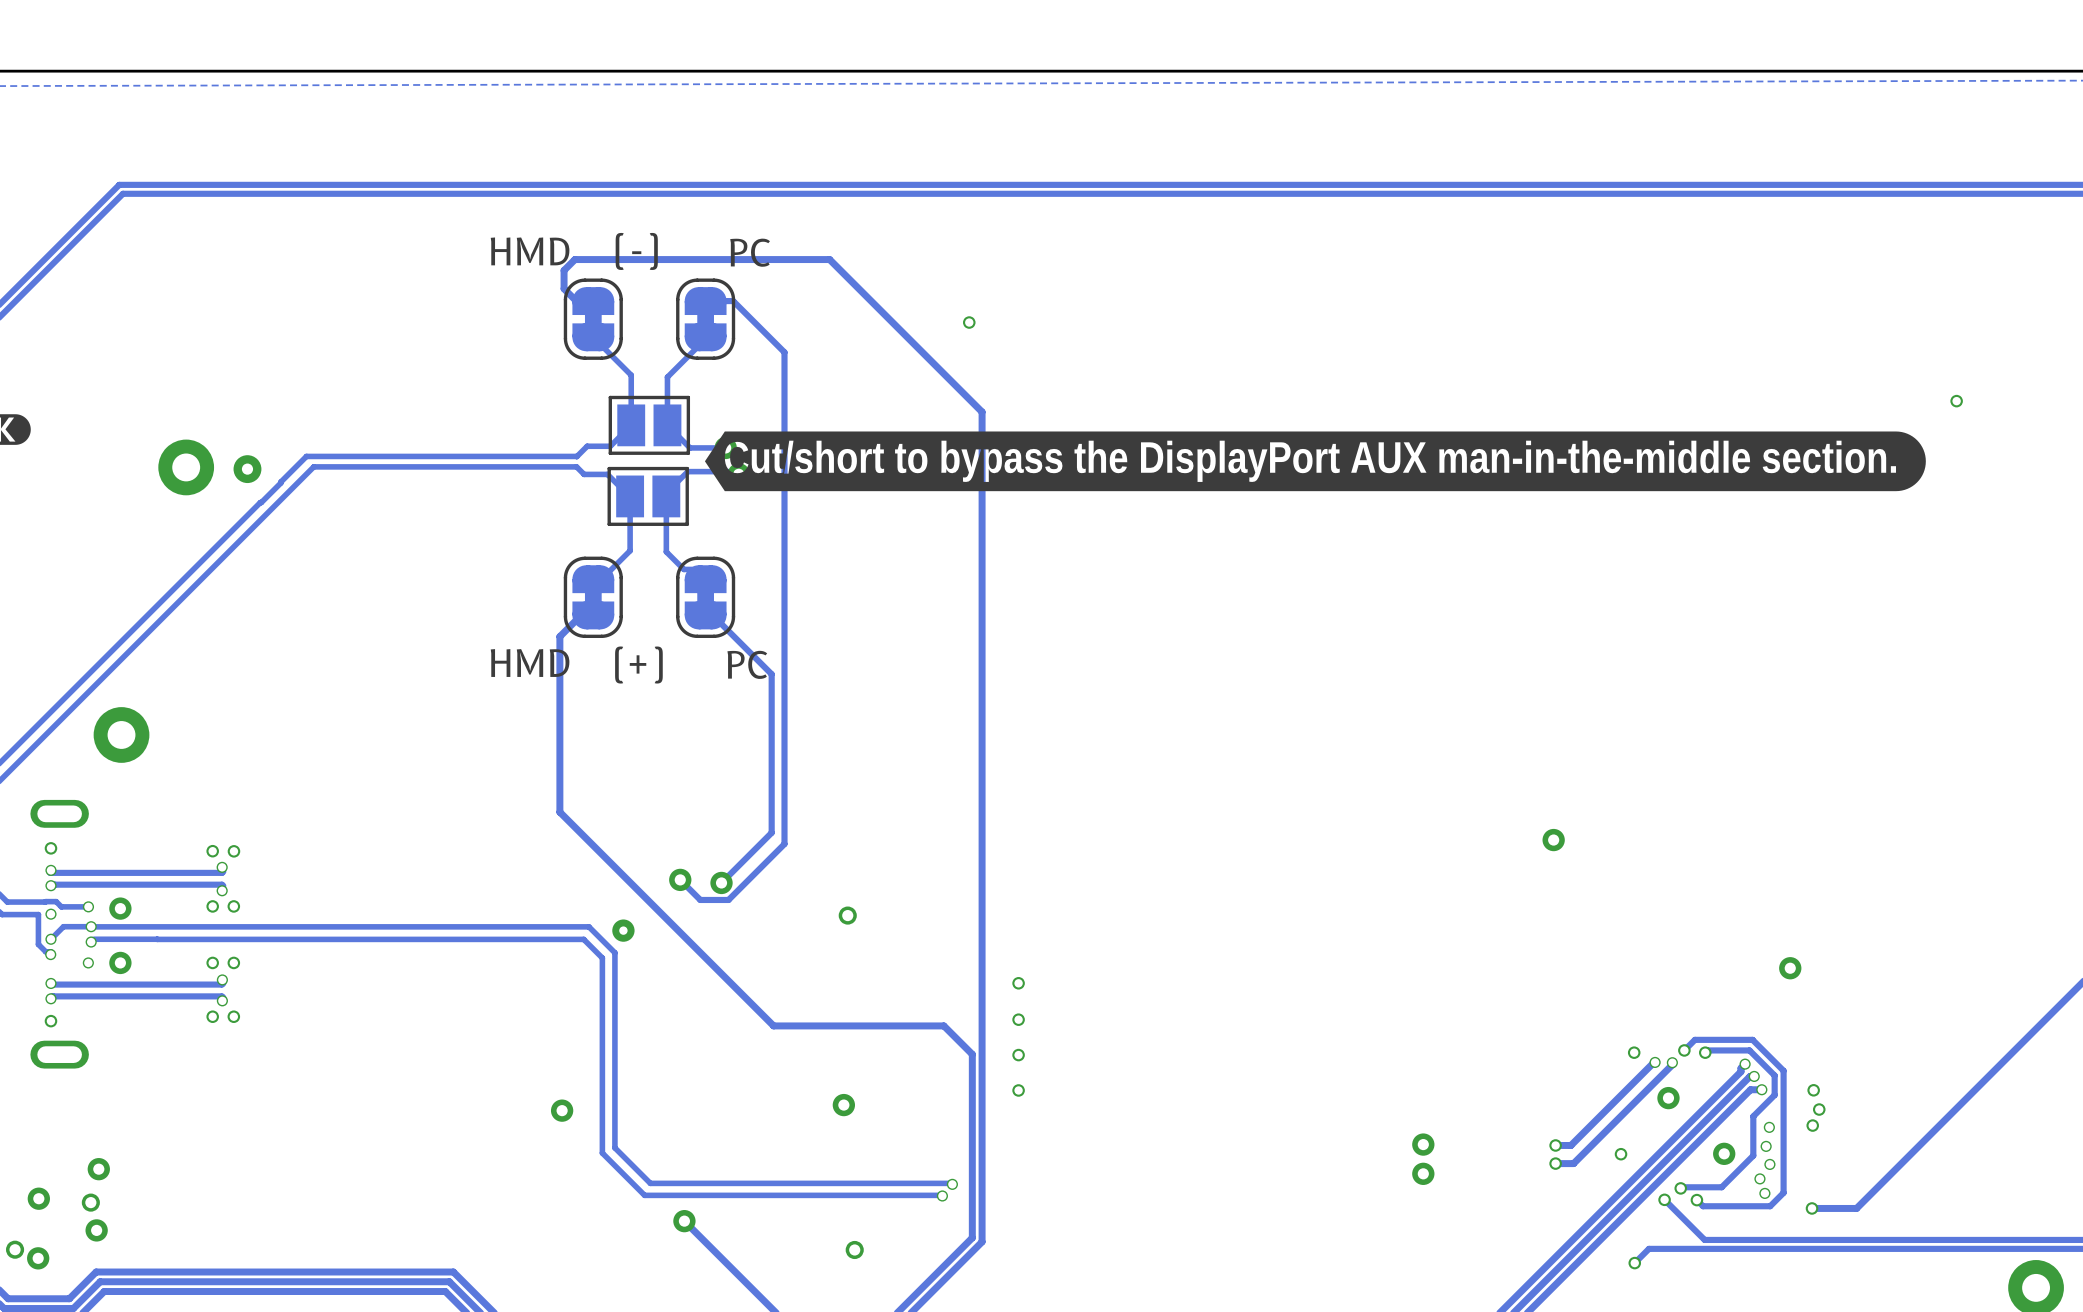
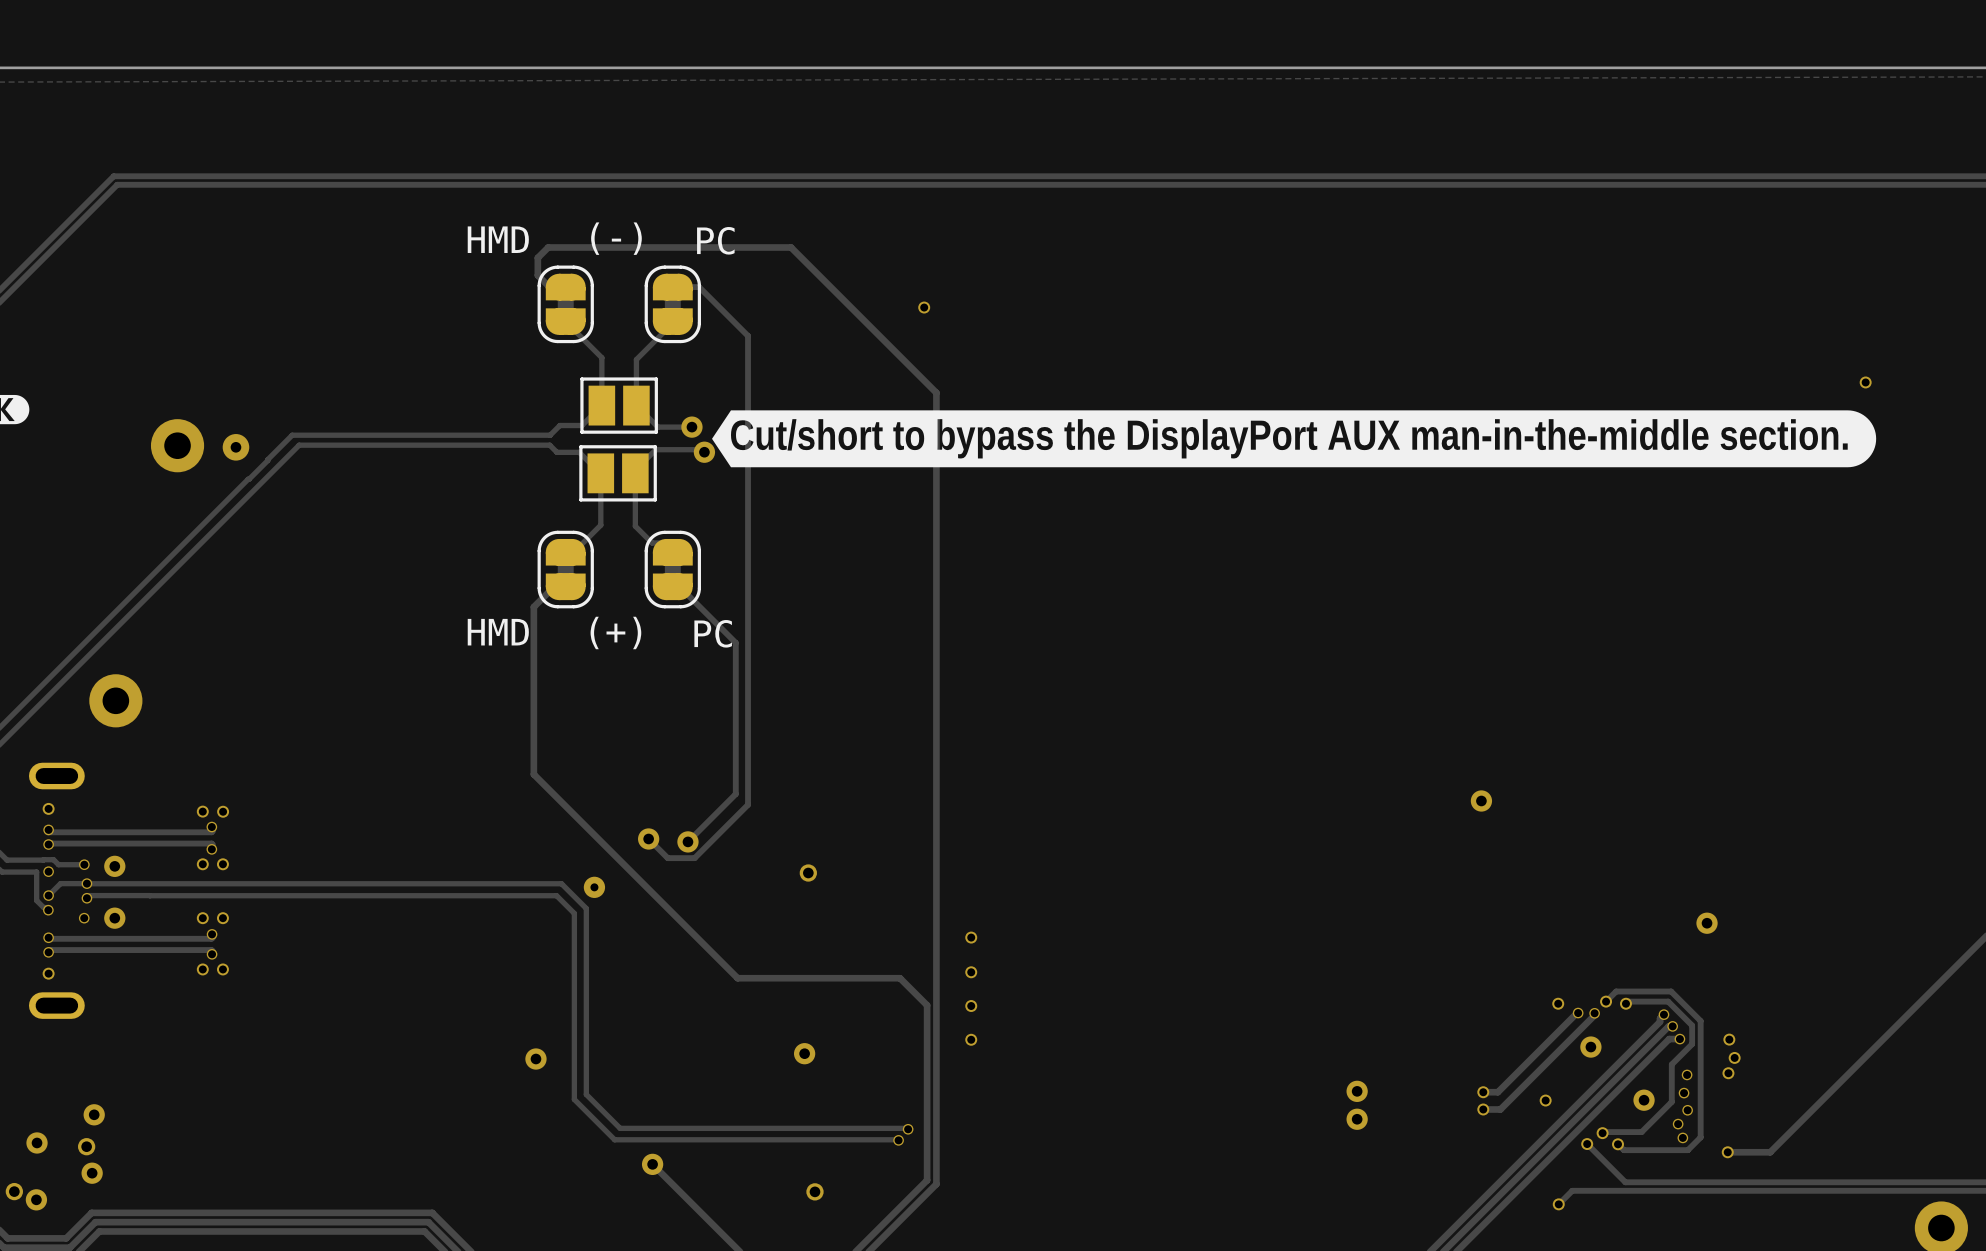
drawing position: (1315, 461) -> (1294, 438)

